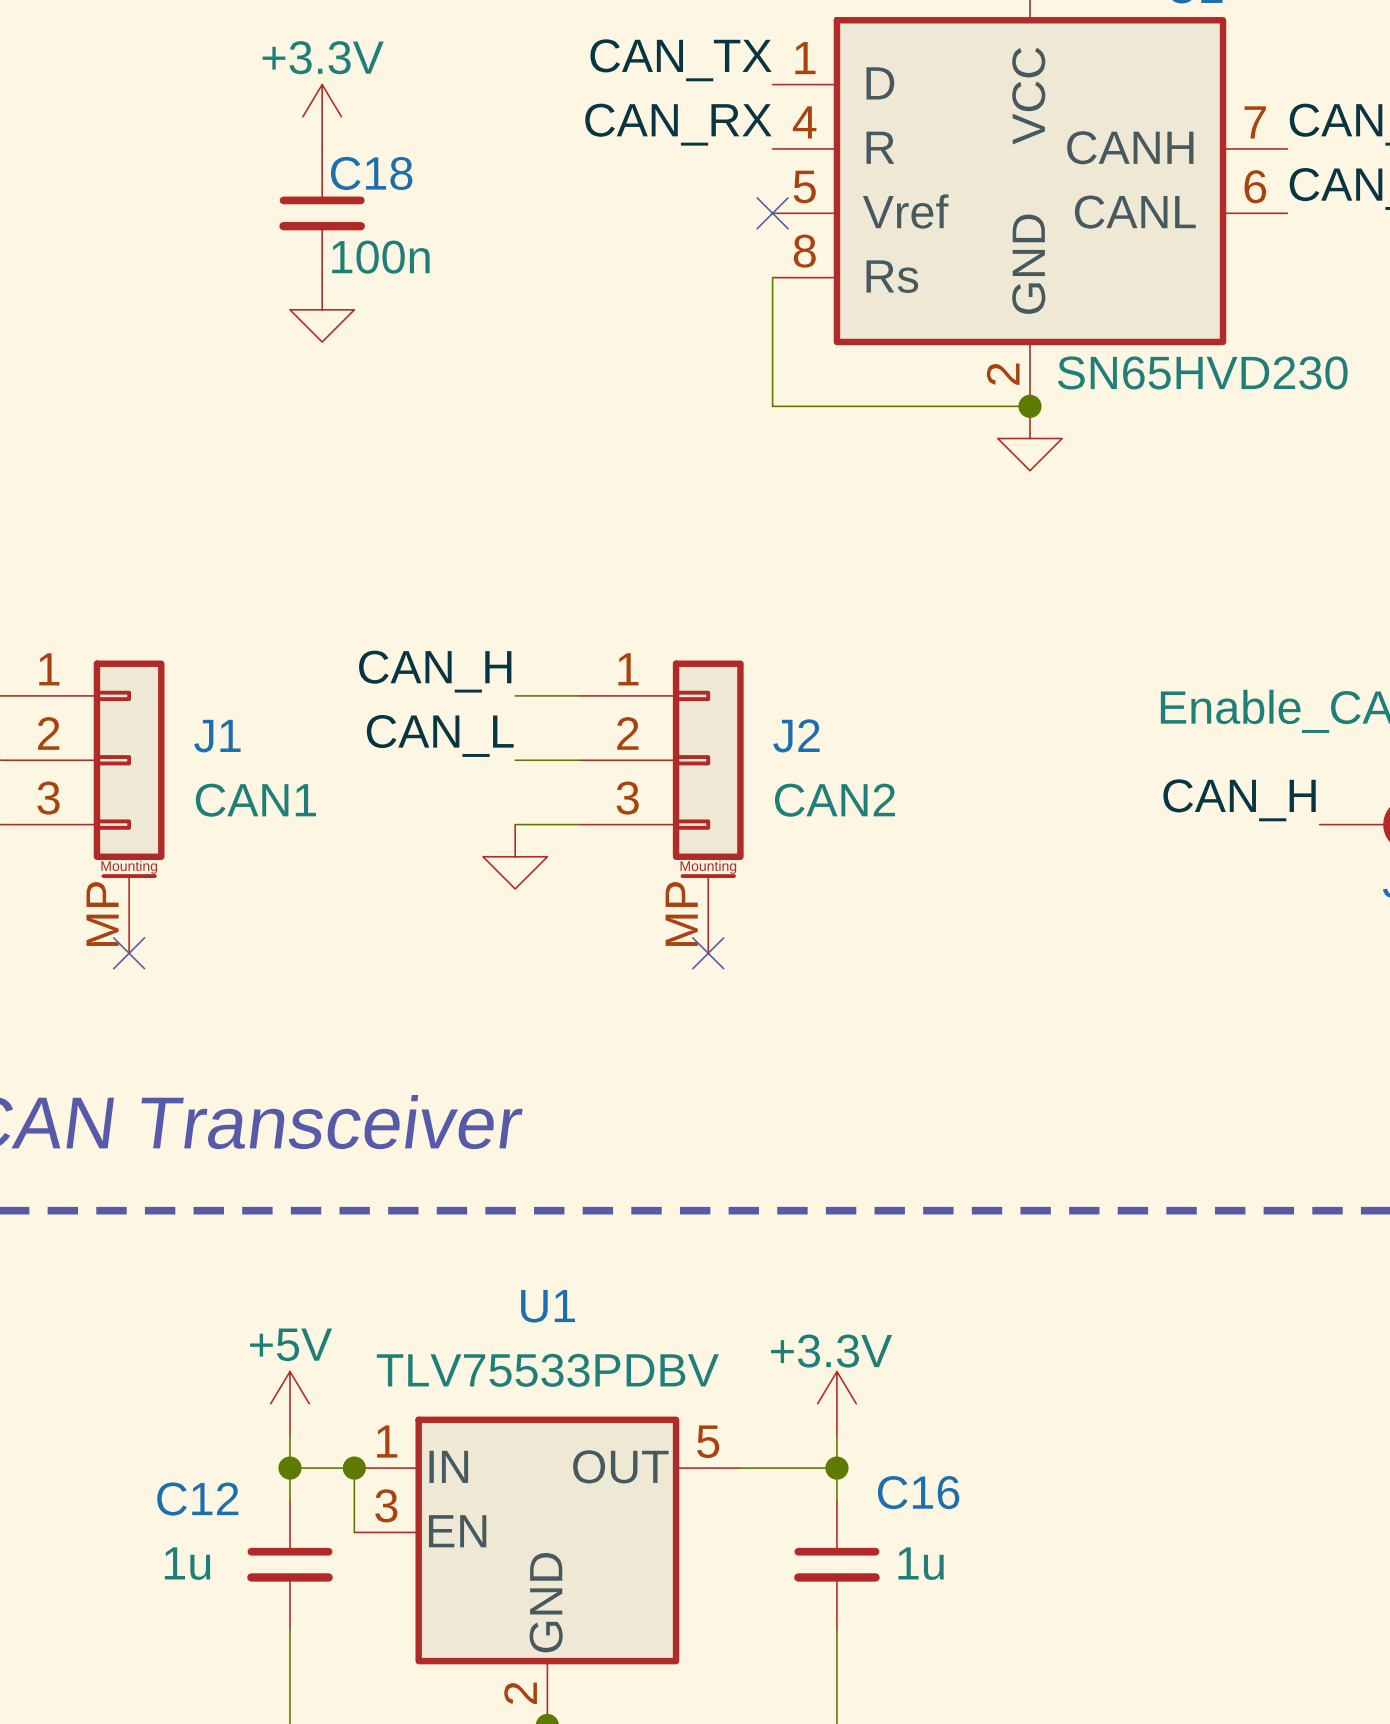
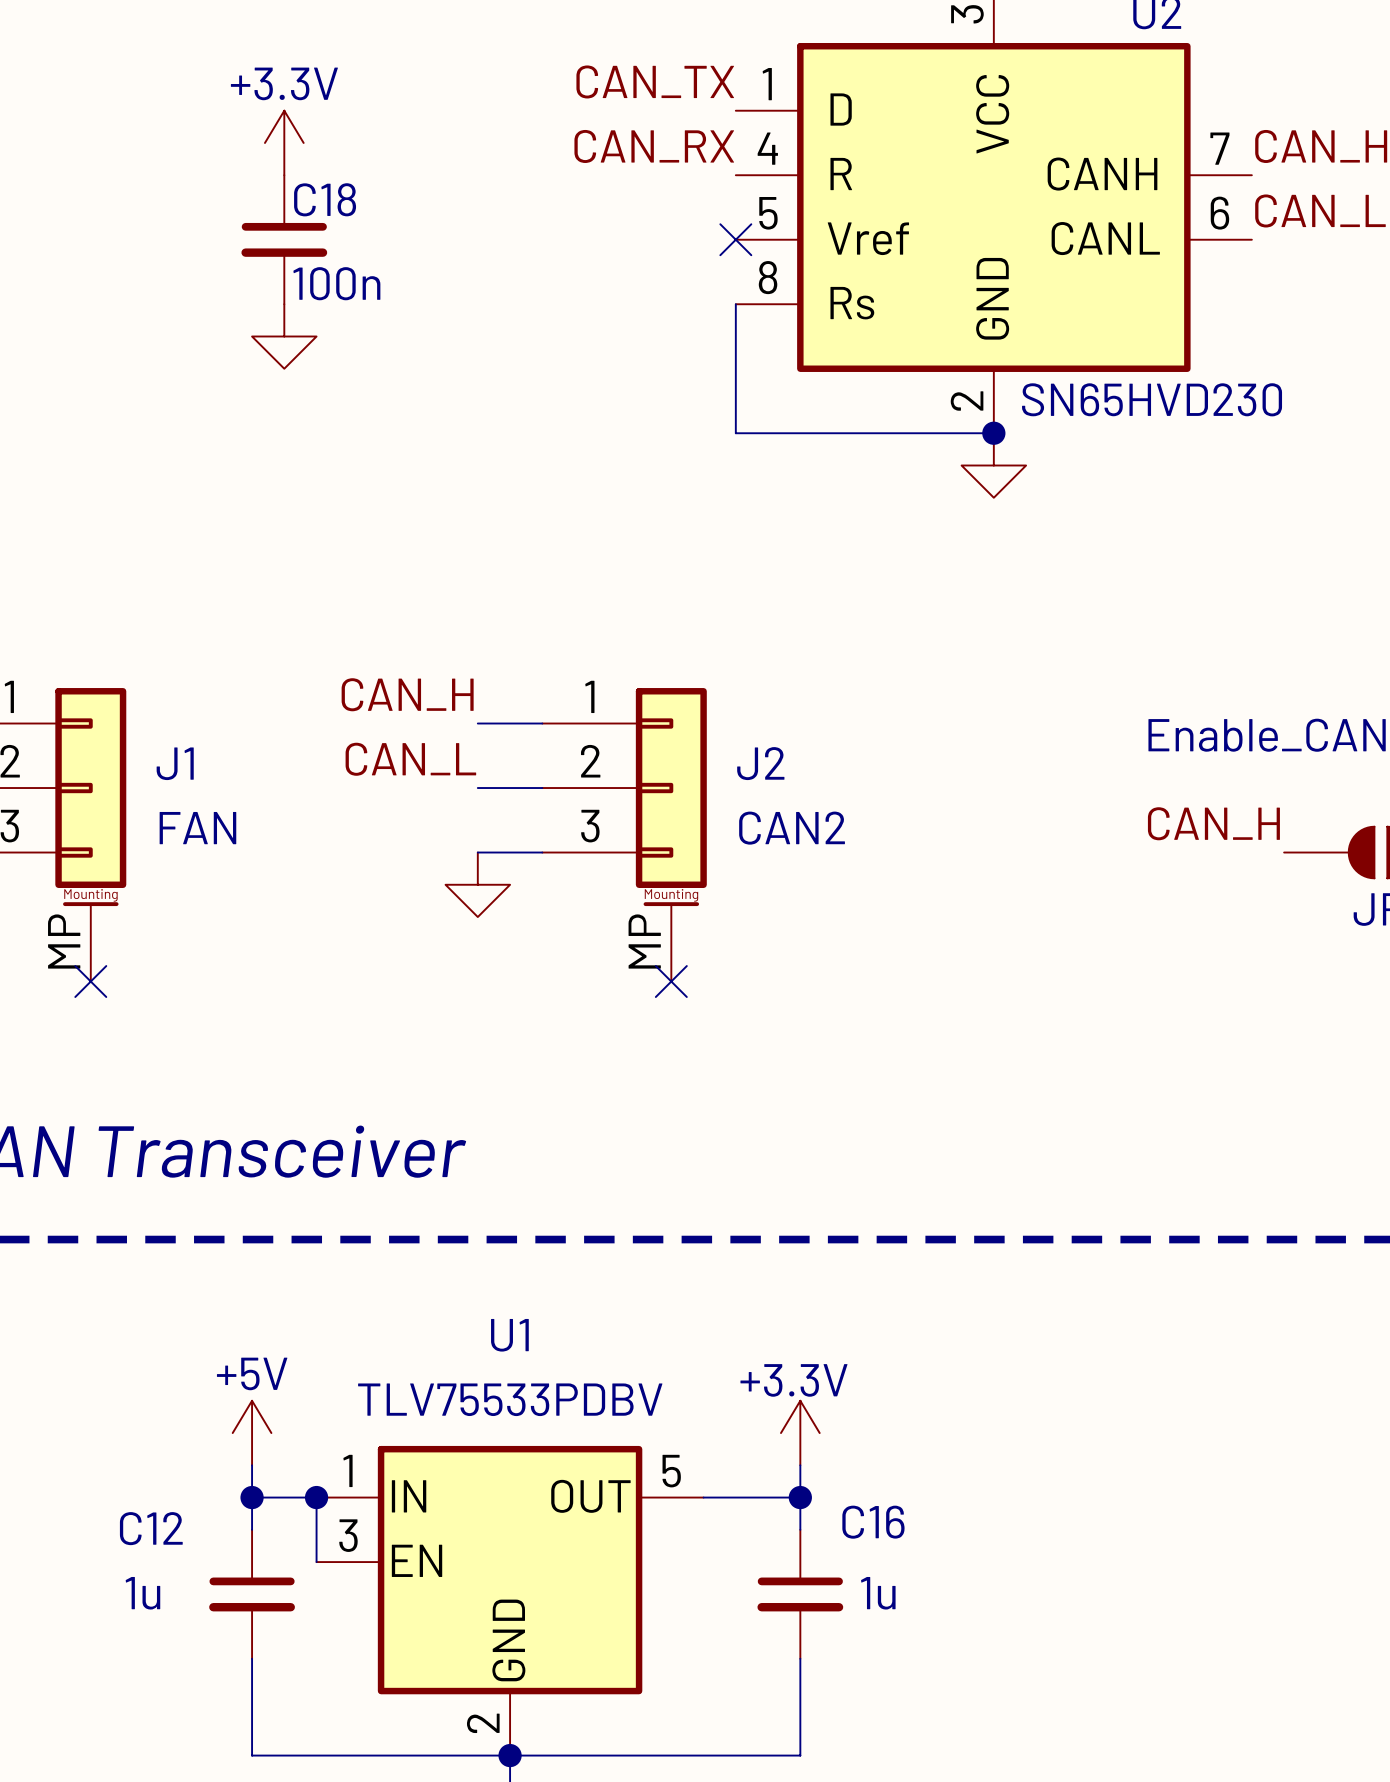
J1 value: CAN1 (255, 800) -> FAN (197, 828)

